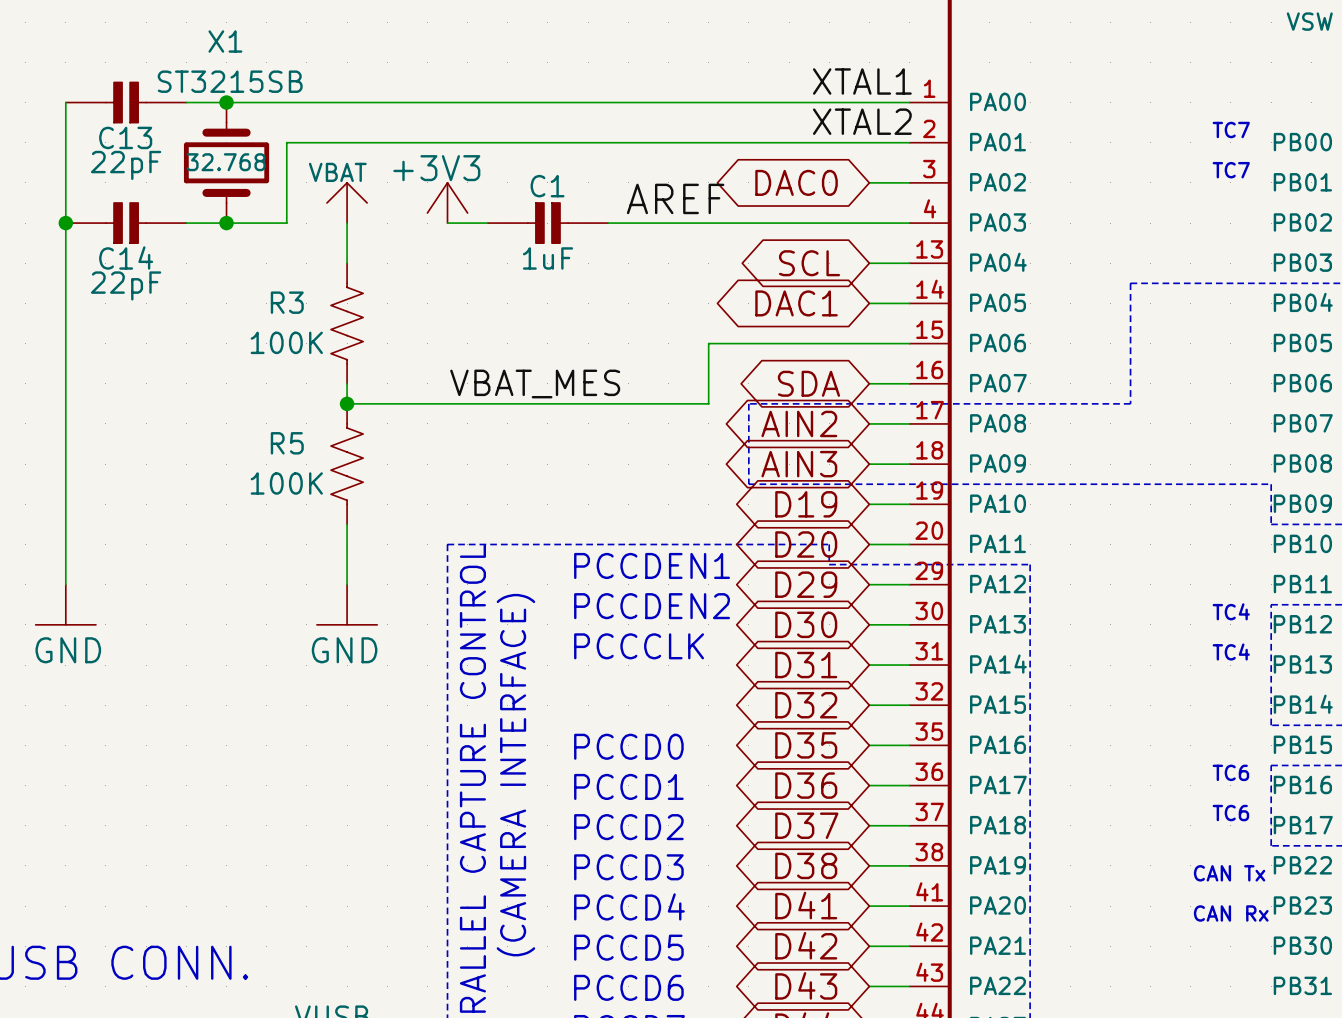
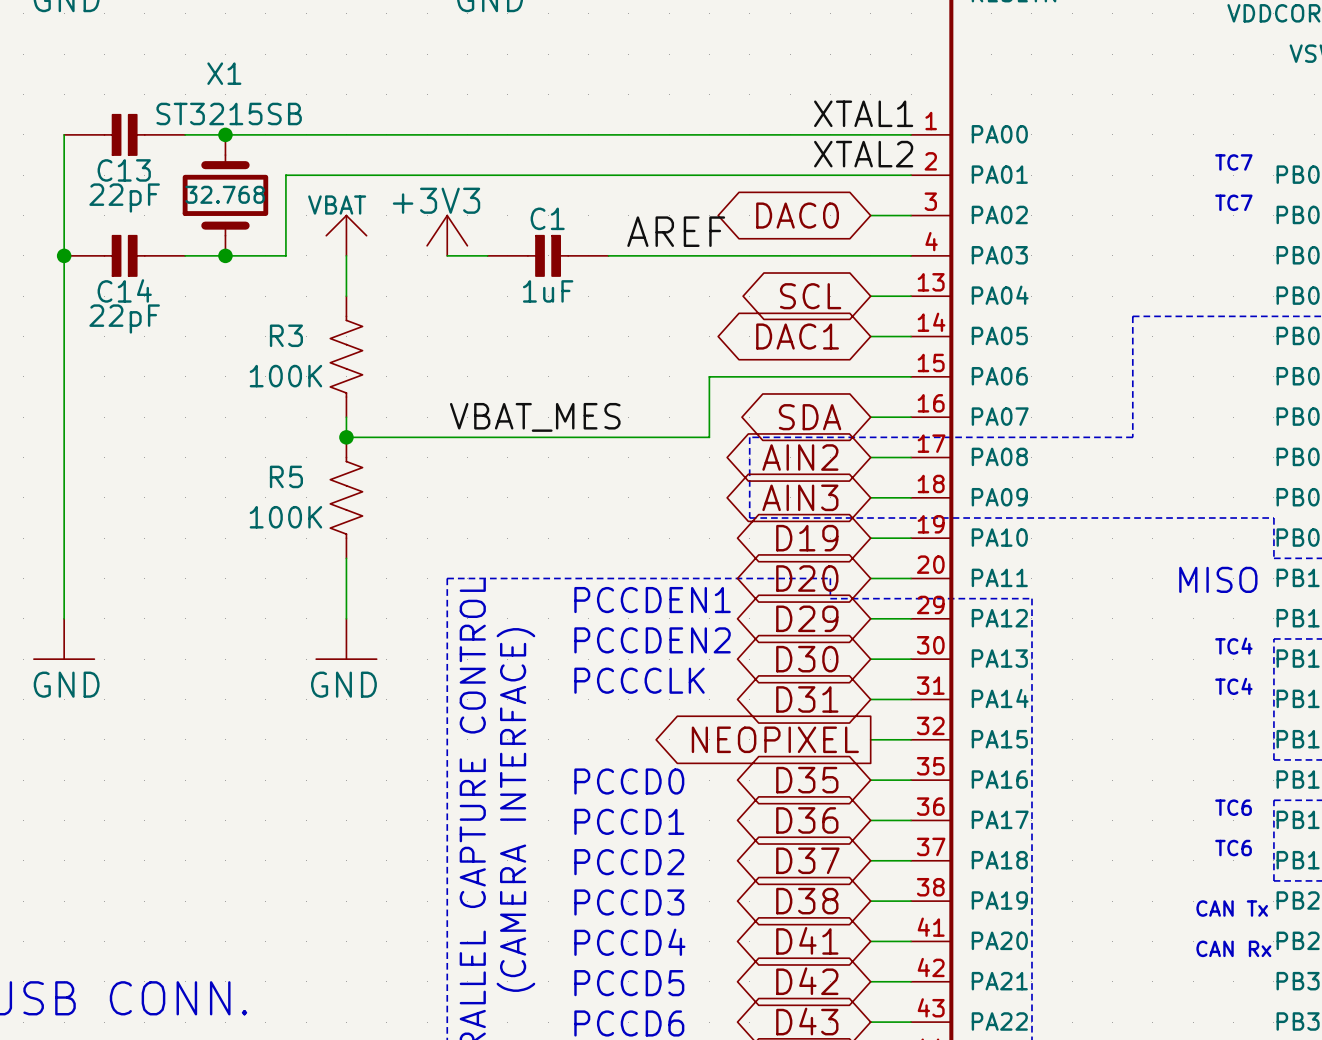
text: none -> MISO (1218, 579)
global label shape: bidirectional (806, 705) -> output (775, 739)
global label: D32 (806, 705) -> NEOPIXEL (775, 739)

